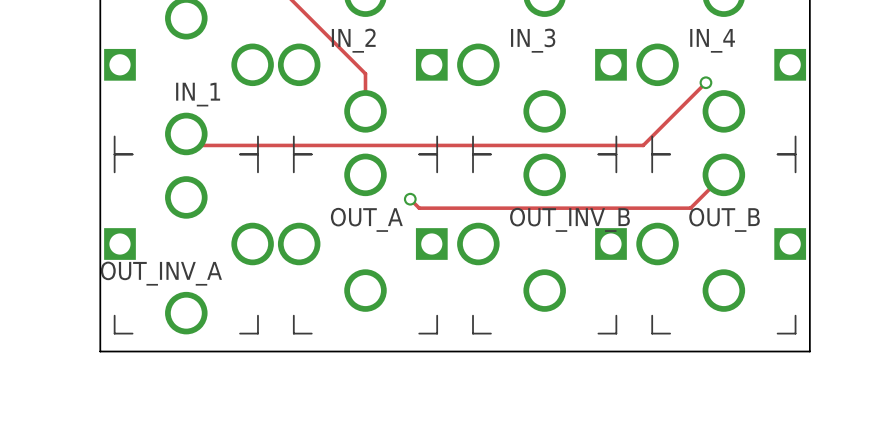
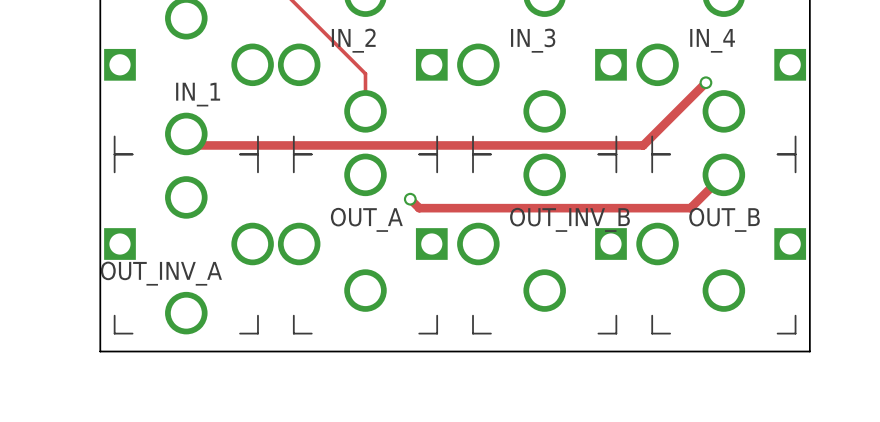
track width: thin (705, 82) (643, 145) (195, 145) (186, 136) (186, 133) -> thick (705, 82) (643, 145) (195, 145) (186, 136) (186, 133)
track width: thin (723, 174) (690, 208) (419, 208) (410, 199) -> thick (723, 174) (690, 208) (419, 208) (410, 199)

